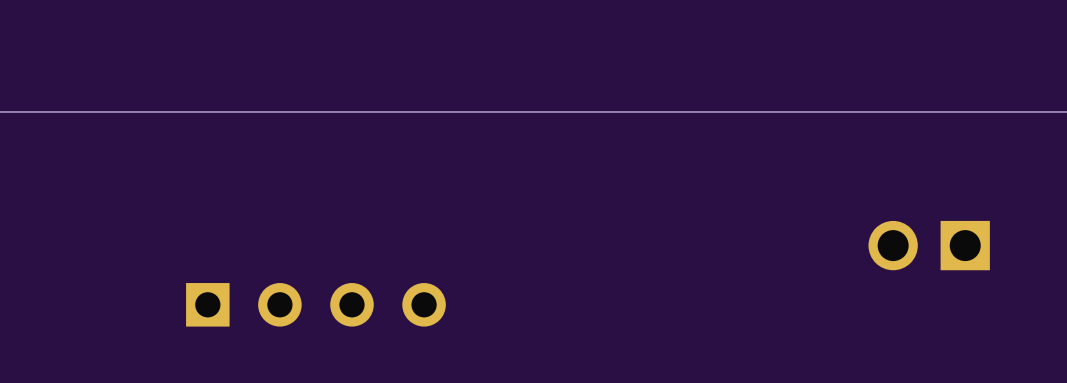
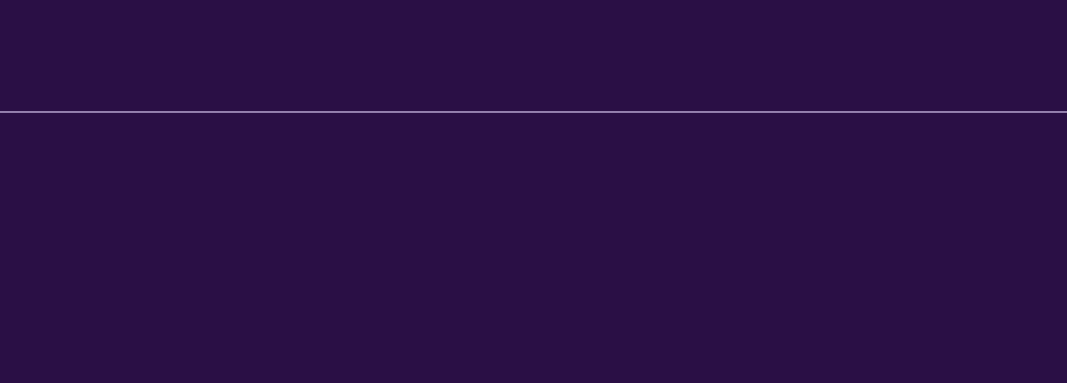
part: (929, 245) -> none
part: (315, 304) -> none

